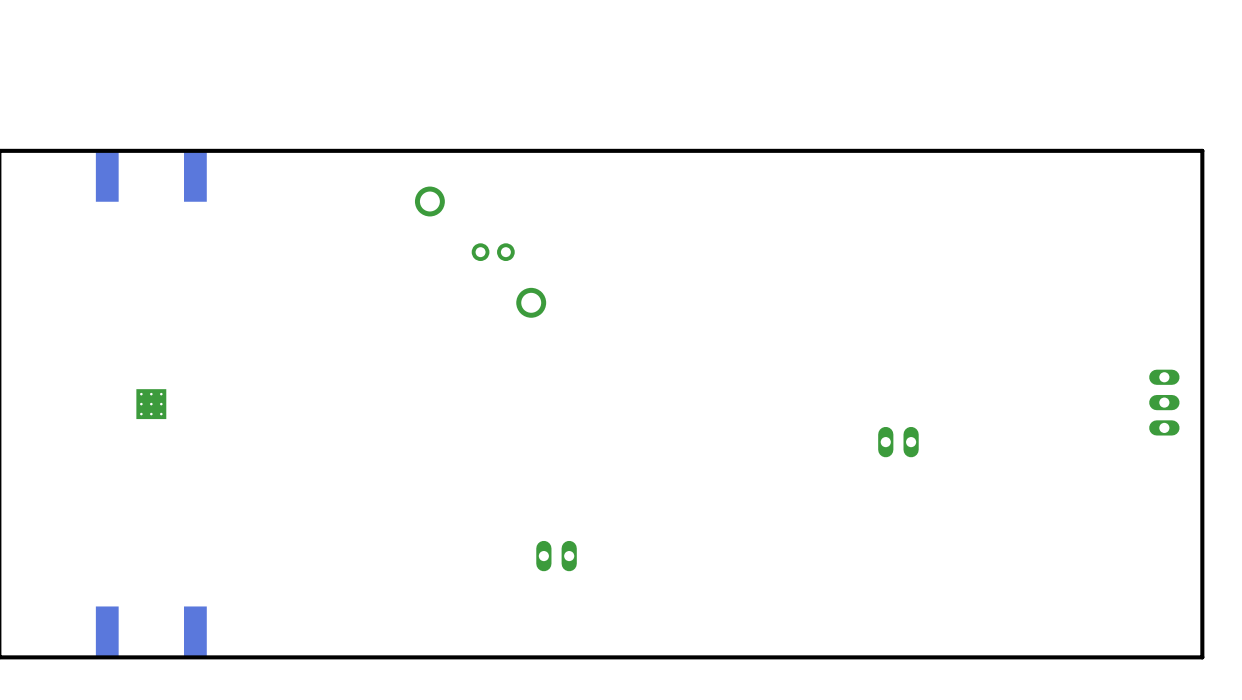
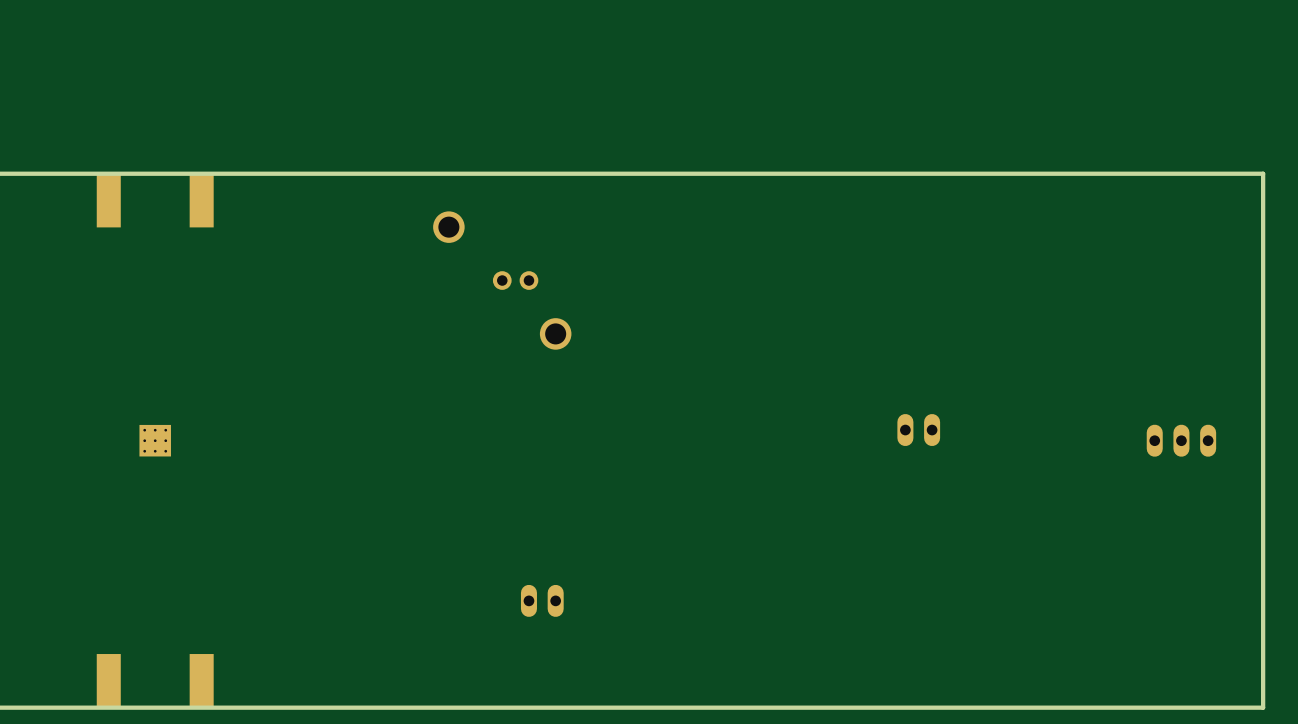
part rotation: 0° (1164, 402) -> 90° clockwise (1181, 440)
part position: (1164, 402) -> (1181, 440)
part position: (898, 442) -> (918, 430)
part position: (556, 556) -> (542, 600)

